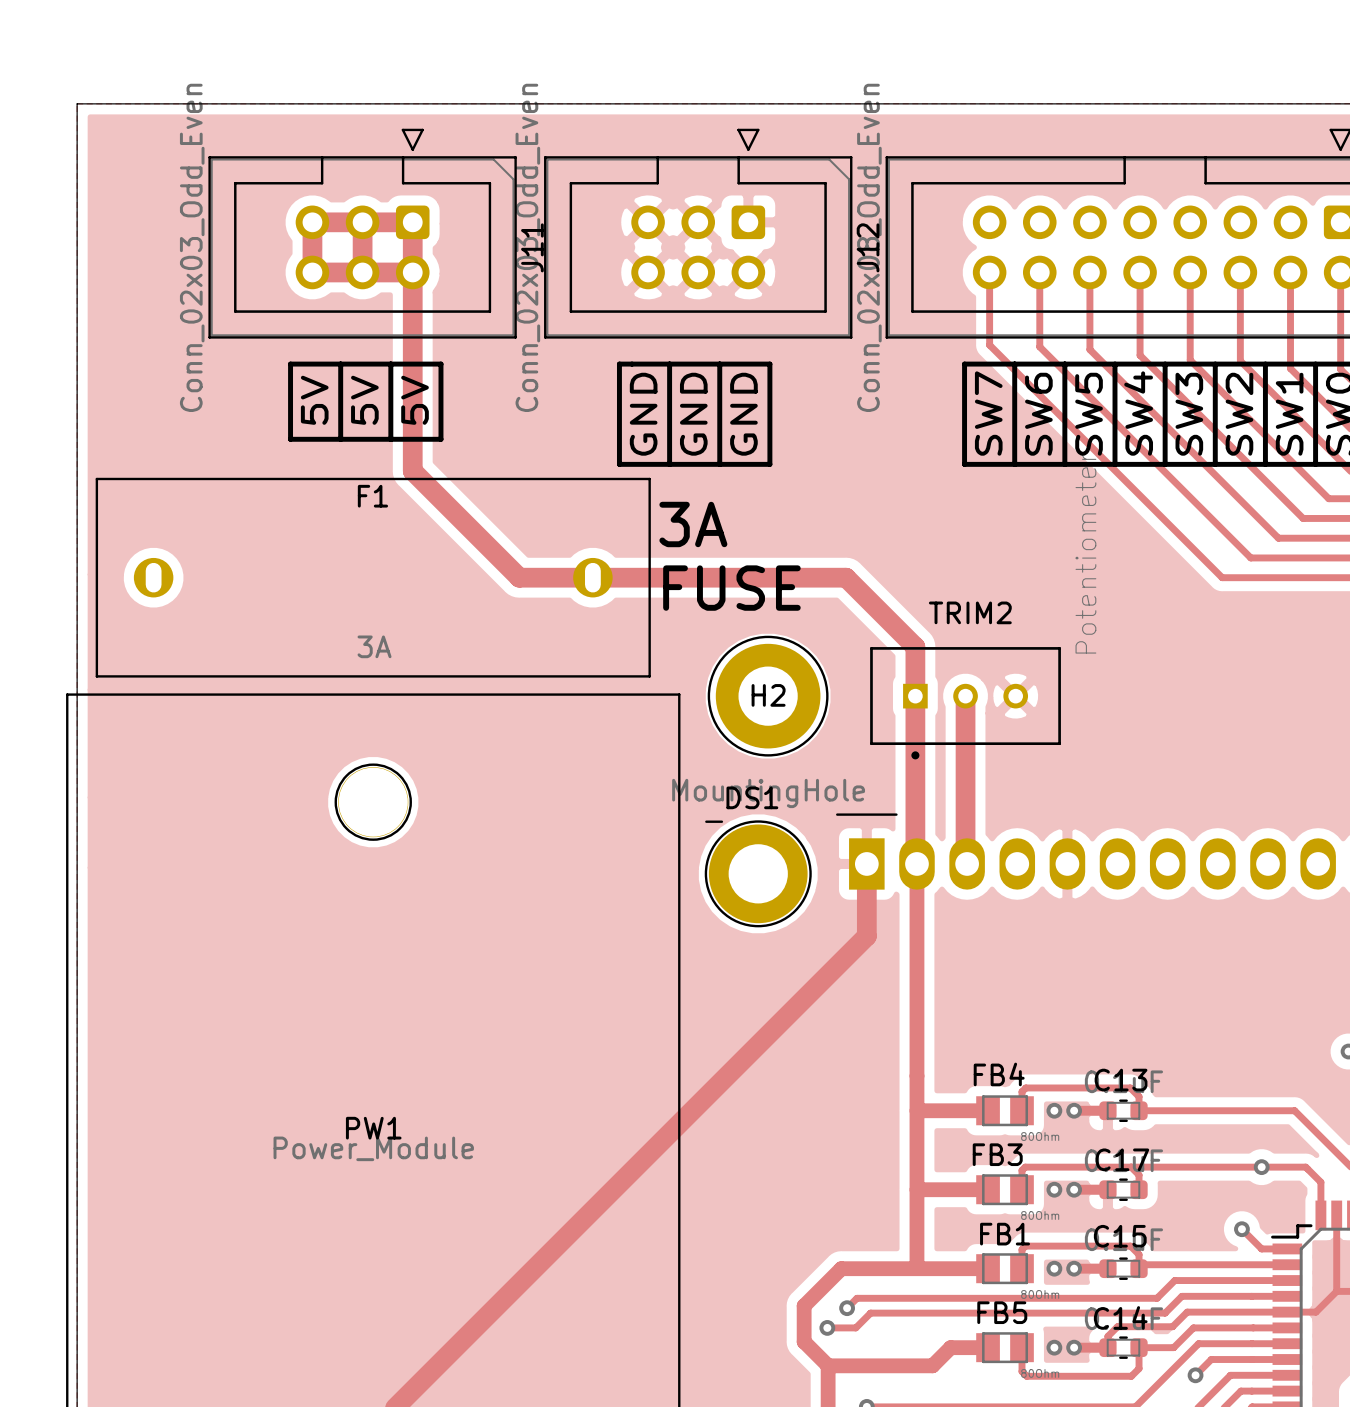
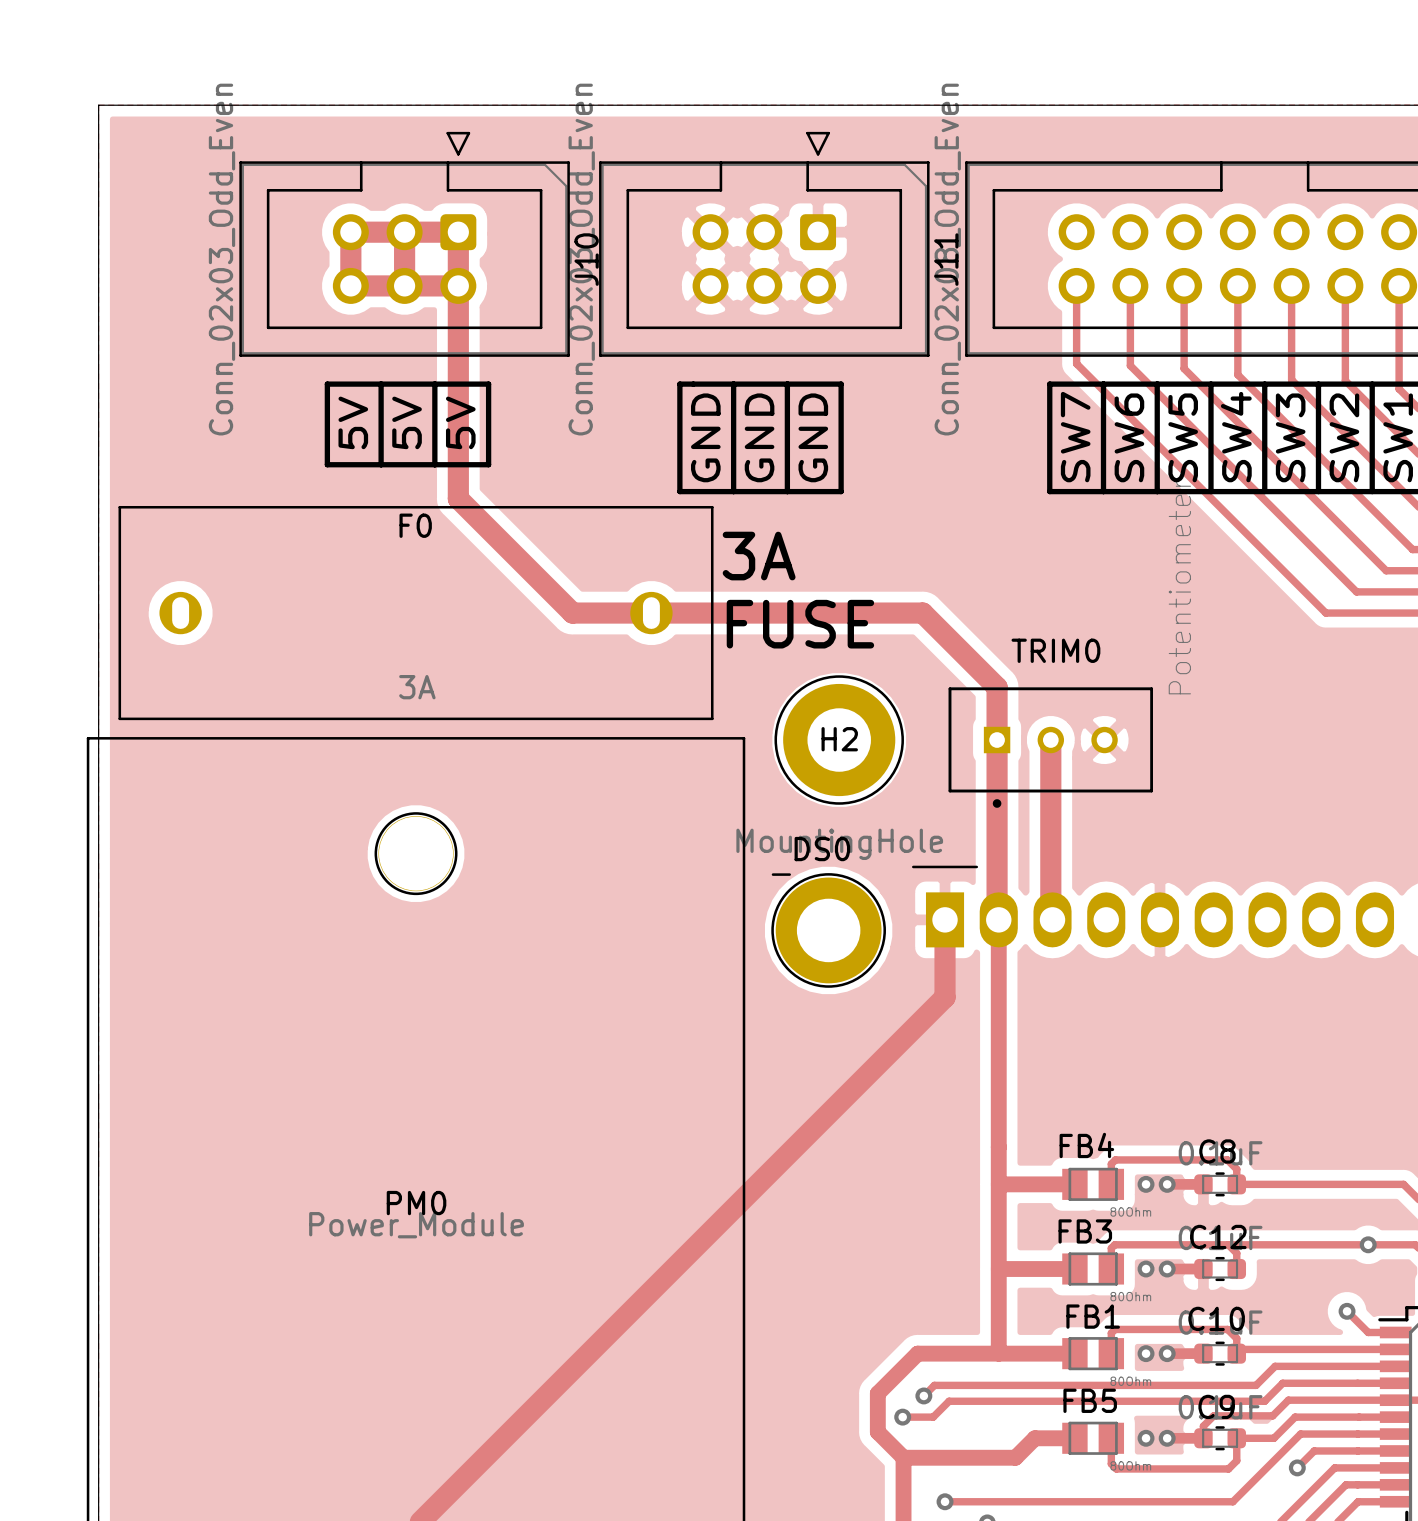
J11 name: J11 (532, 247) -> J10 (586, 259)
J12 name: J12 (868, 247) -> J11 (946, 259)
F1 name: F1 (372, 496) -> F0 (415, 525)
TRIM2 name: TRIM2 (970, 612) -> TRIM0 (1055, 650)
DS1 name: DS1 (752, 797) -> DS0 (822, 849)
C13 name: C13 (1121, 1080) -> C8 (1217, 1151)
PW1 name: PW1 (373, 1128) -> PM0 (416, 1203)
C17 name: C17 (1122, 1159) -> C12 (1218, 1236)
C15 name: C15 (1120, 1236) -> C10 (1216, 1318)
C14 name: C14 (1120, 1317) -> C9 (1216, 1406)

